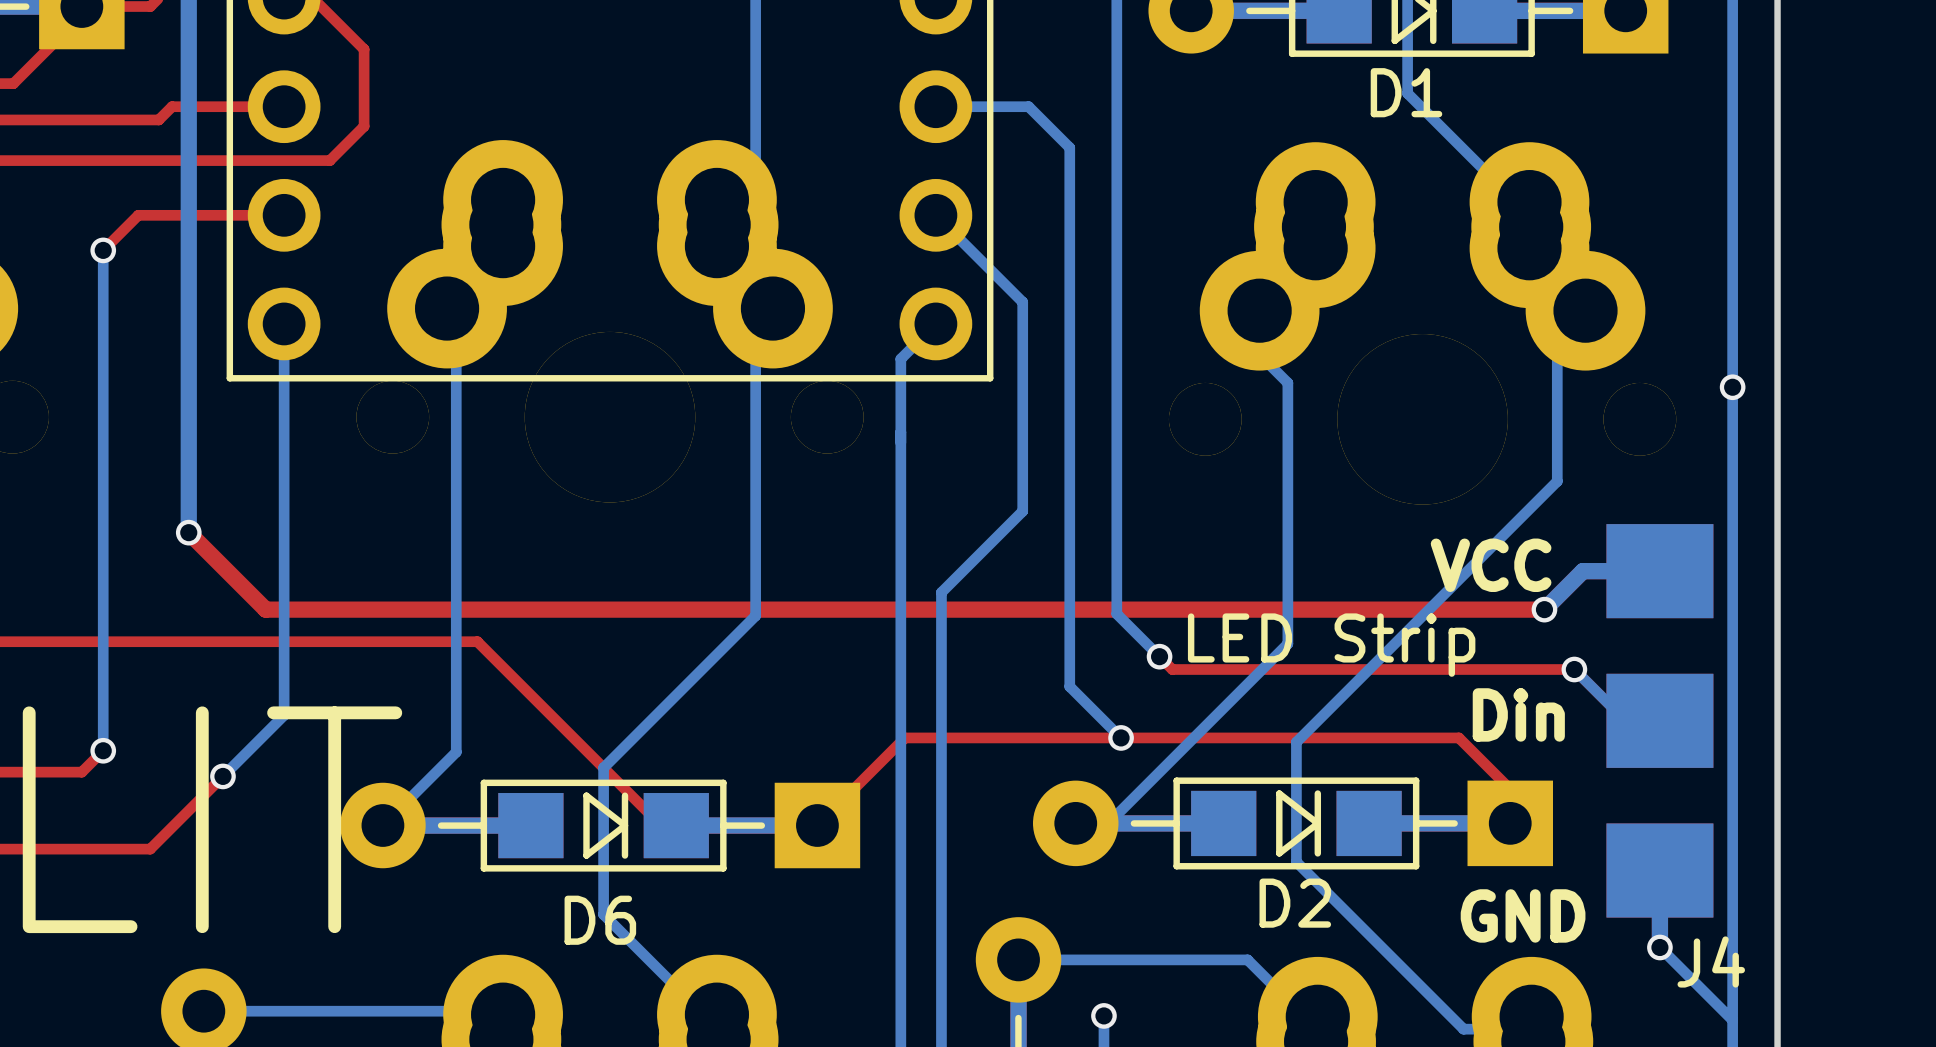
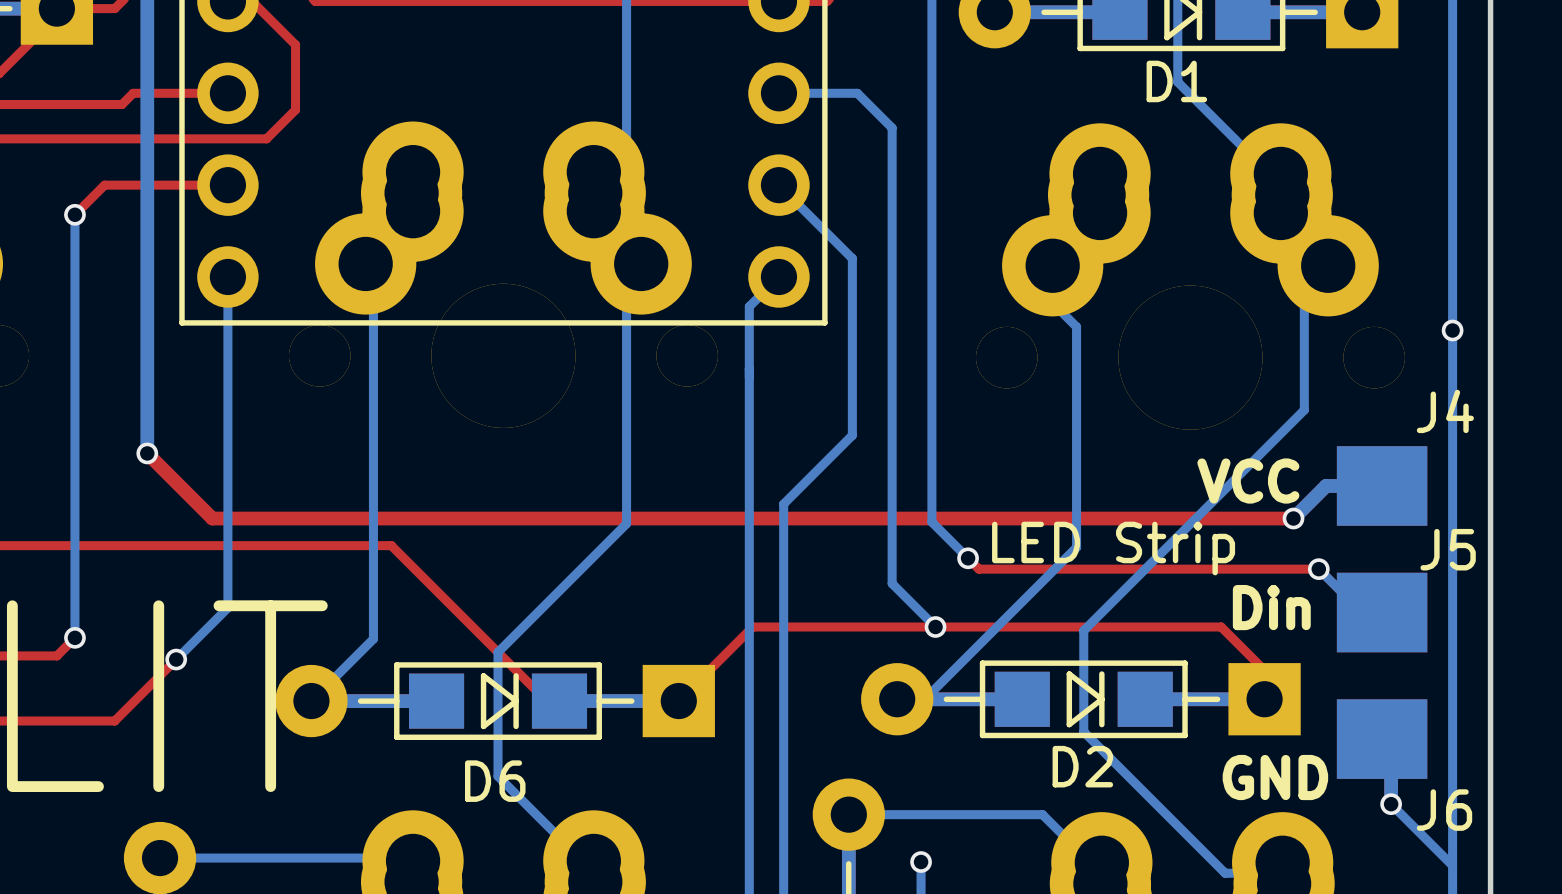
text: none -> J4 (1445, 411)
part footprint: [1606, 524, 1714, 918] -> [1336, 572, 1428, 653]
part: none -> (1382, 485)
text: none -> J5 (1448, 549)
part: none -> (1382, 739)
text: J4 (1711, 961) -> J6 (1444, 810)

